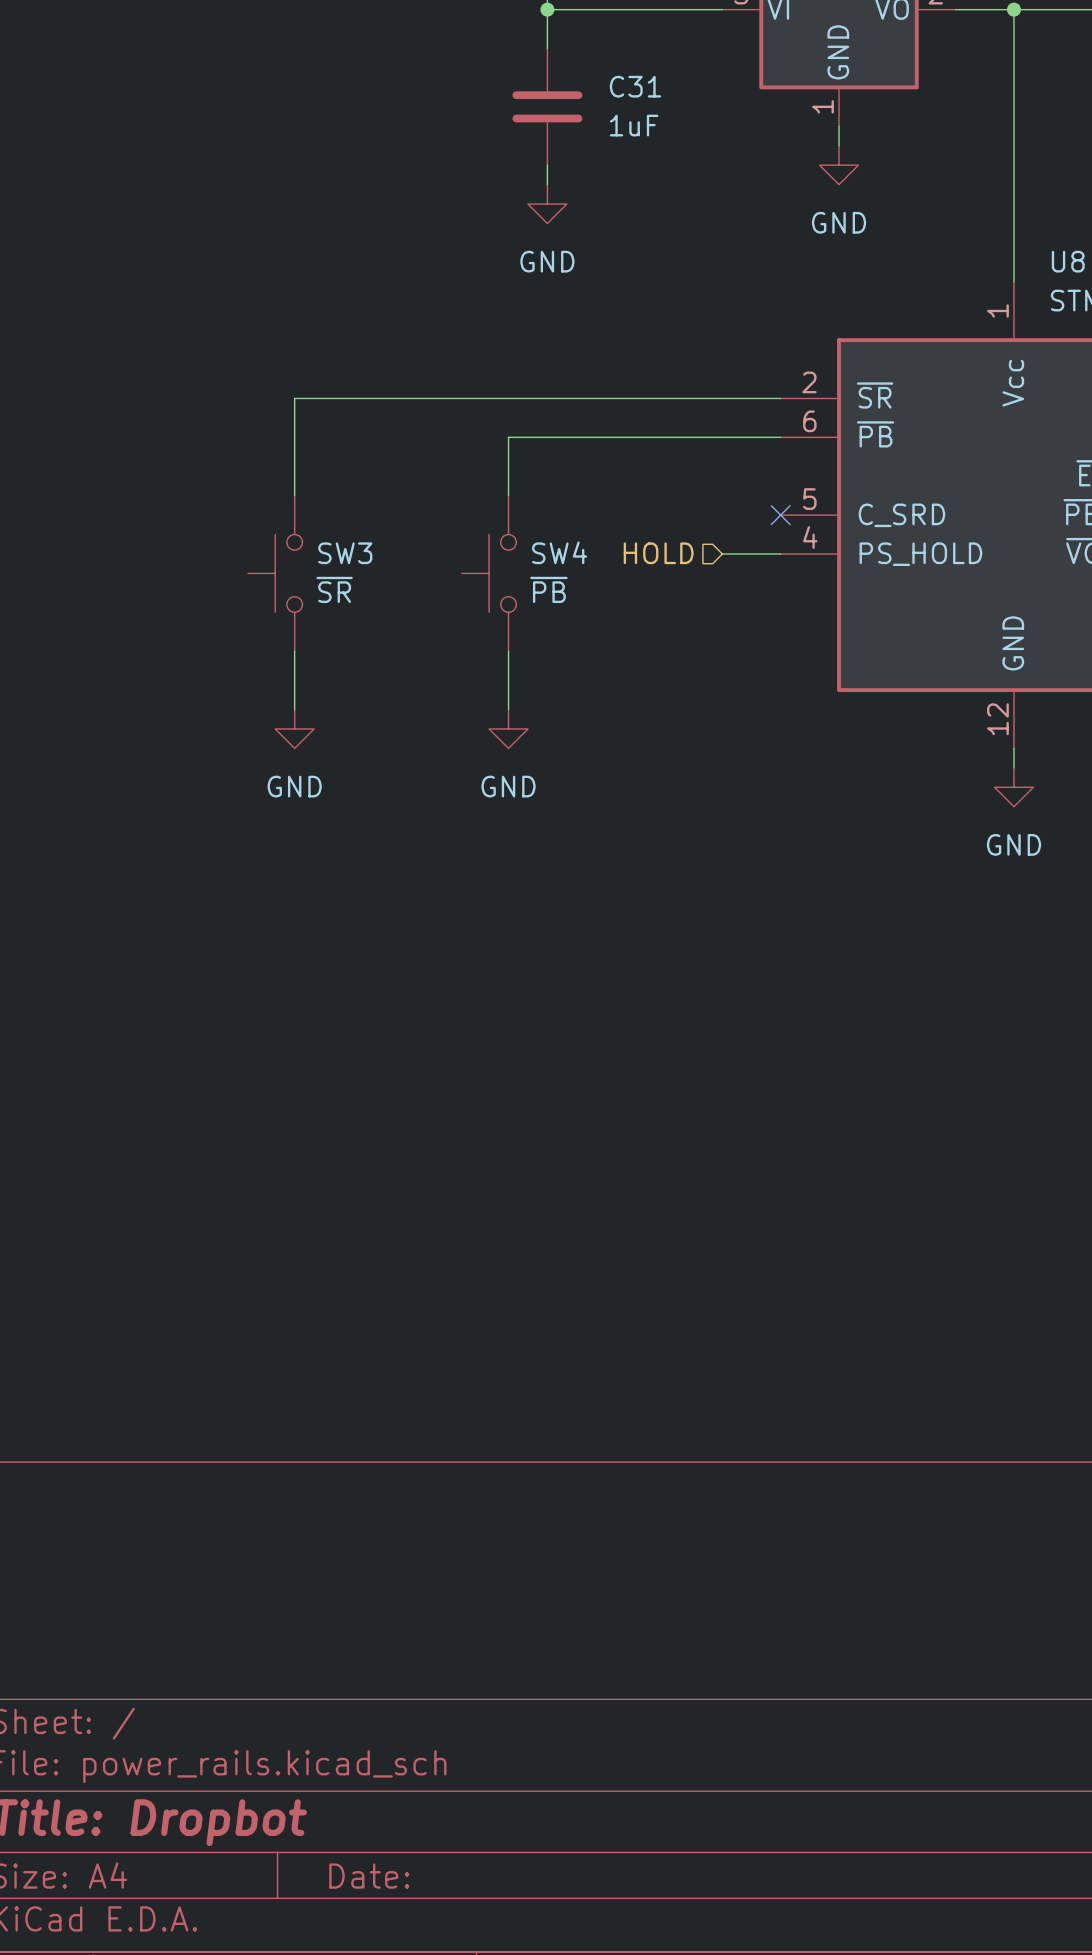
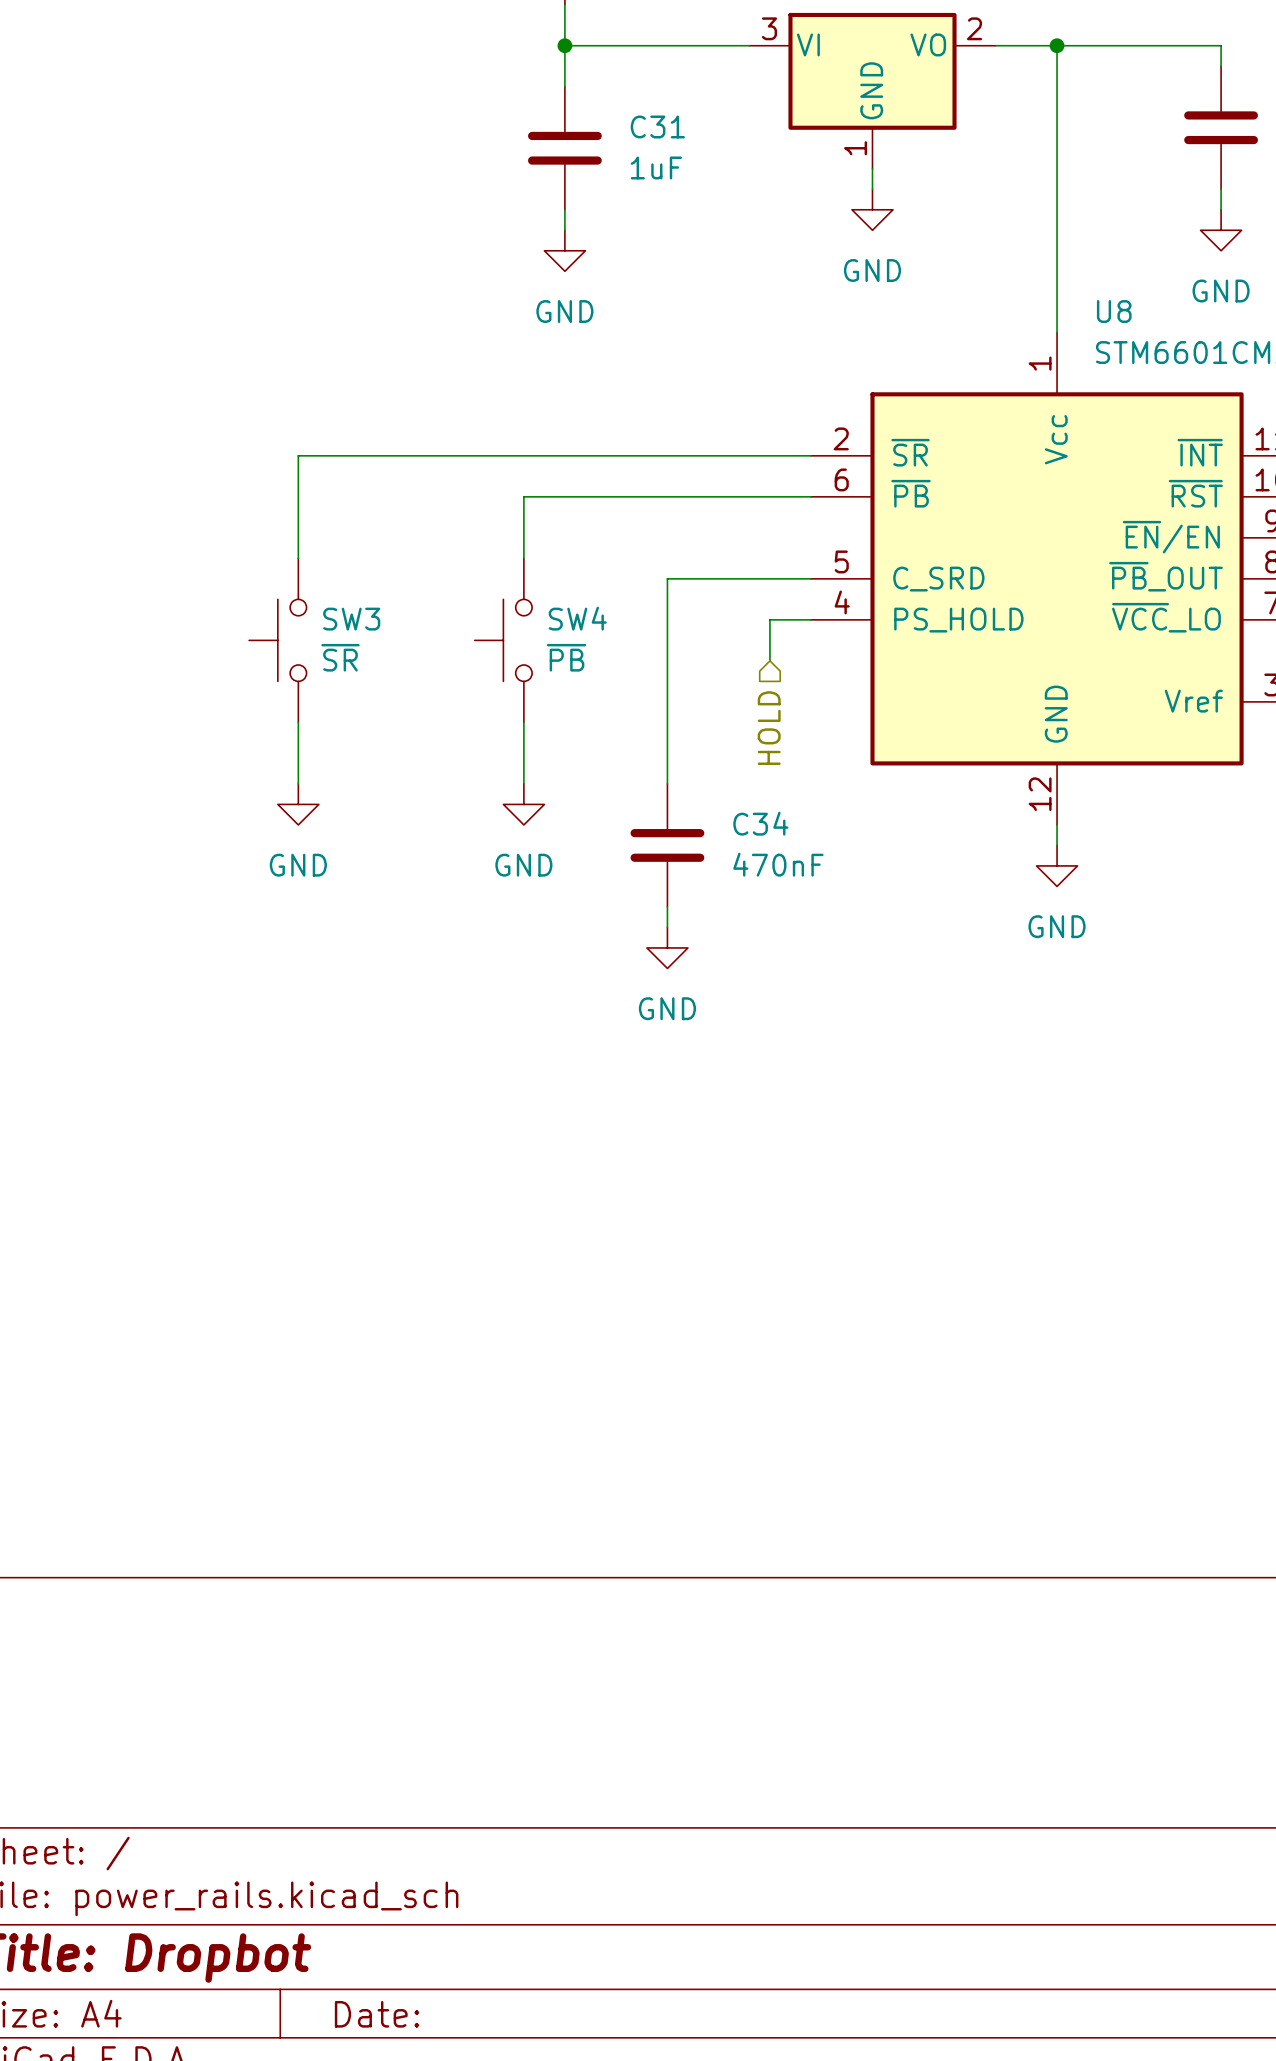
wire: none -> (810, 578) (667, 578) (667, 783)
no-connect mark: (780, 515) -> none
hierarchical label rotation: 0° (658, 553) -> 90° counterclockwise (769, 728)
hierarchical label position: HOLD (658, 553) -> HOLD (769, 728)
wire: (722, 554) (741, 554) -> (769, 660) (769, 619)
C34: none -> 470nF (667, 845)
wire: none -> (667, 906) (667, 927)
power symbol: none -> GND (667, 947)

